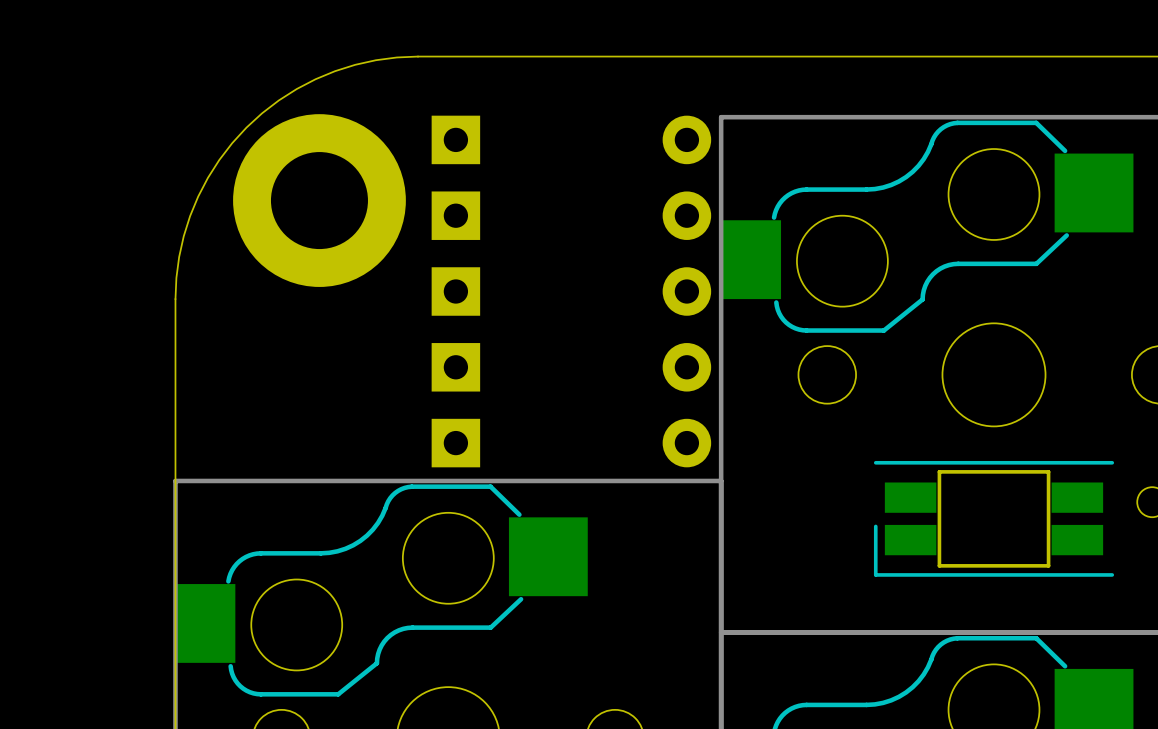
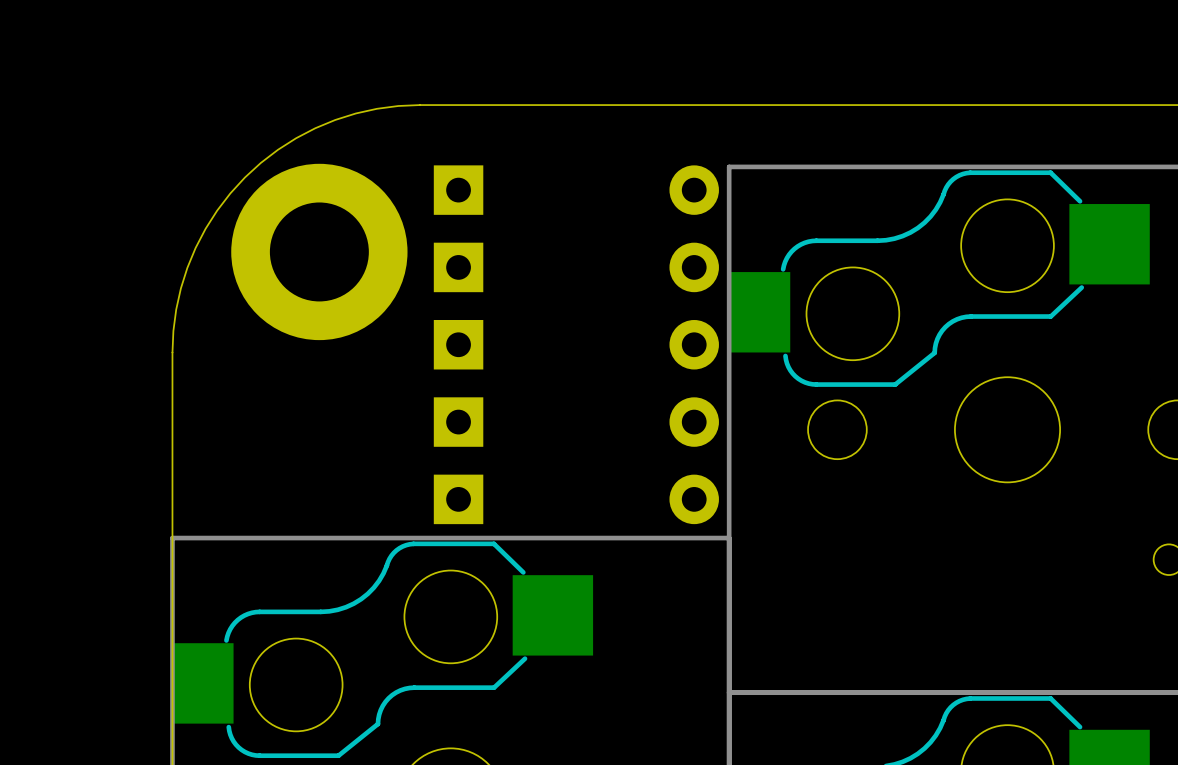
part: (993, 518) -> none

